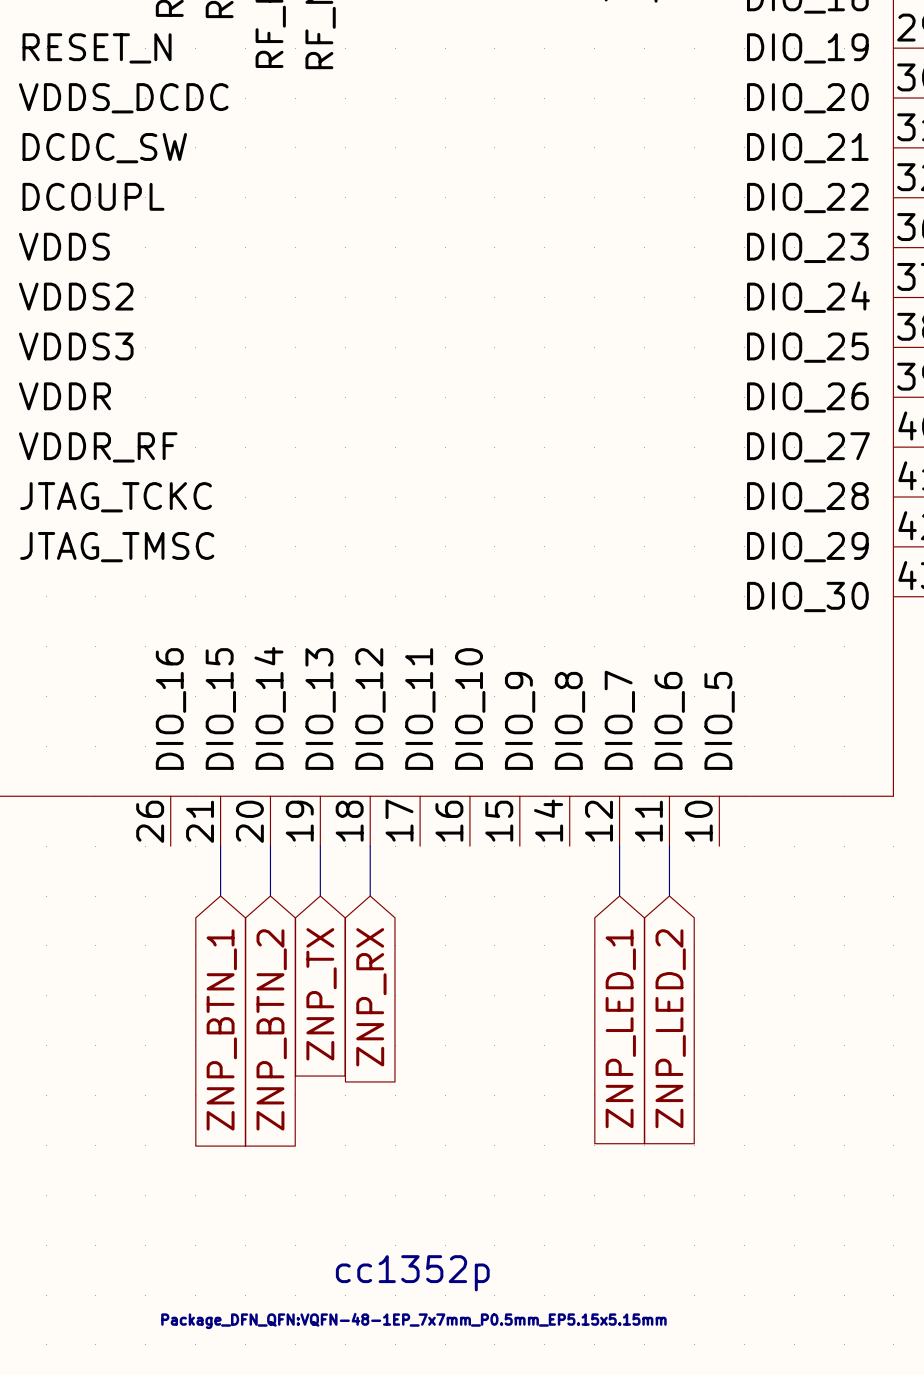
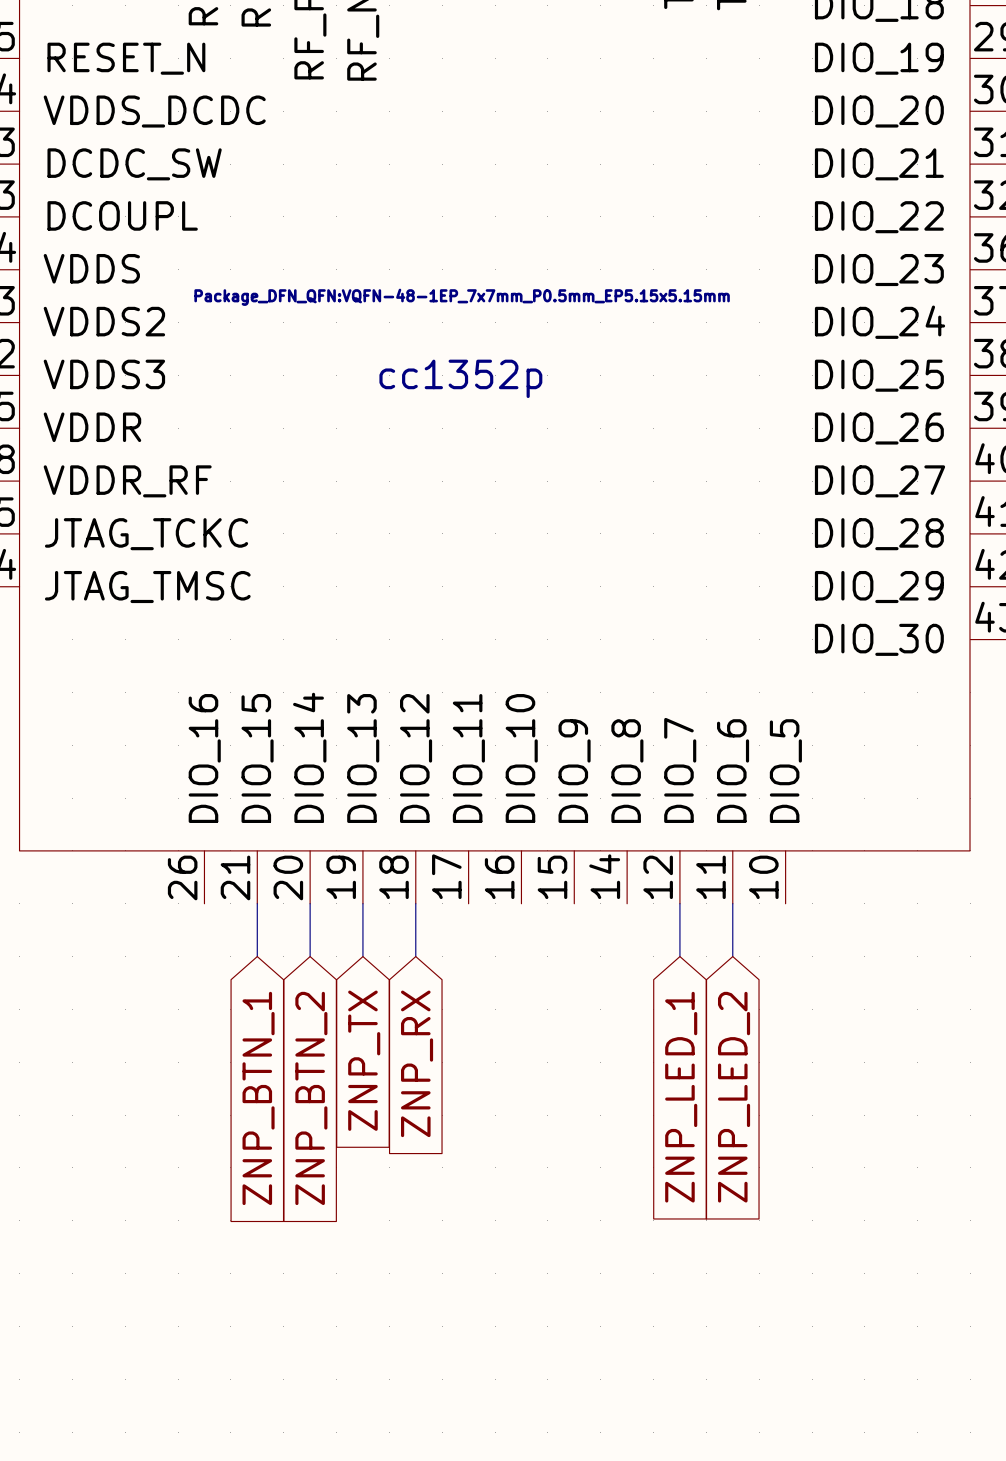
part value position: cc1352p (412, 1273) -> cc1352p (460, 378)
part text position: Package_DFN_QFN:VQFN-48-1EP_7x7mm_P0.5mm_EP5.15x5.15mm (413, 1320) -> Package_DFN_QFN:VQFN-48-1EP_7x7mm_P0.5mm_EP5.15x5.15mm (462, 297)

